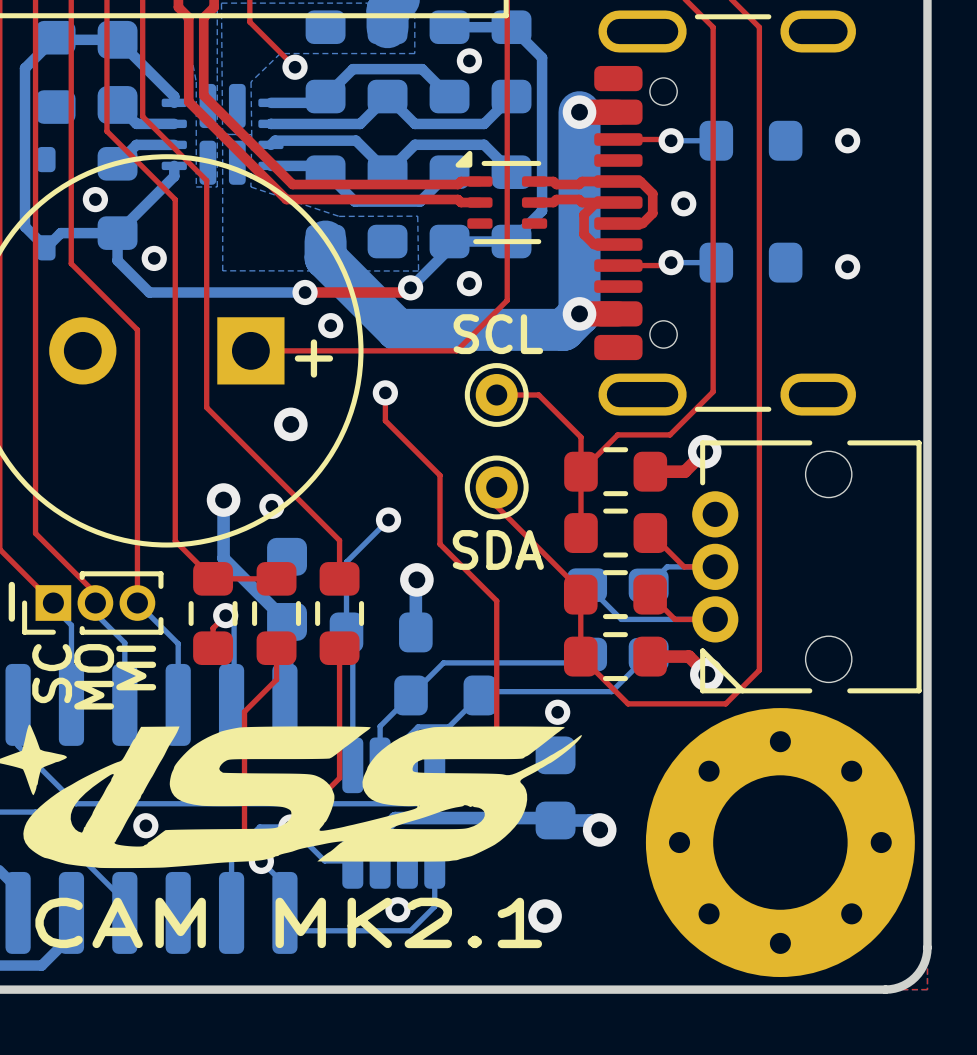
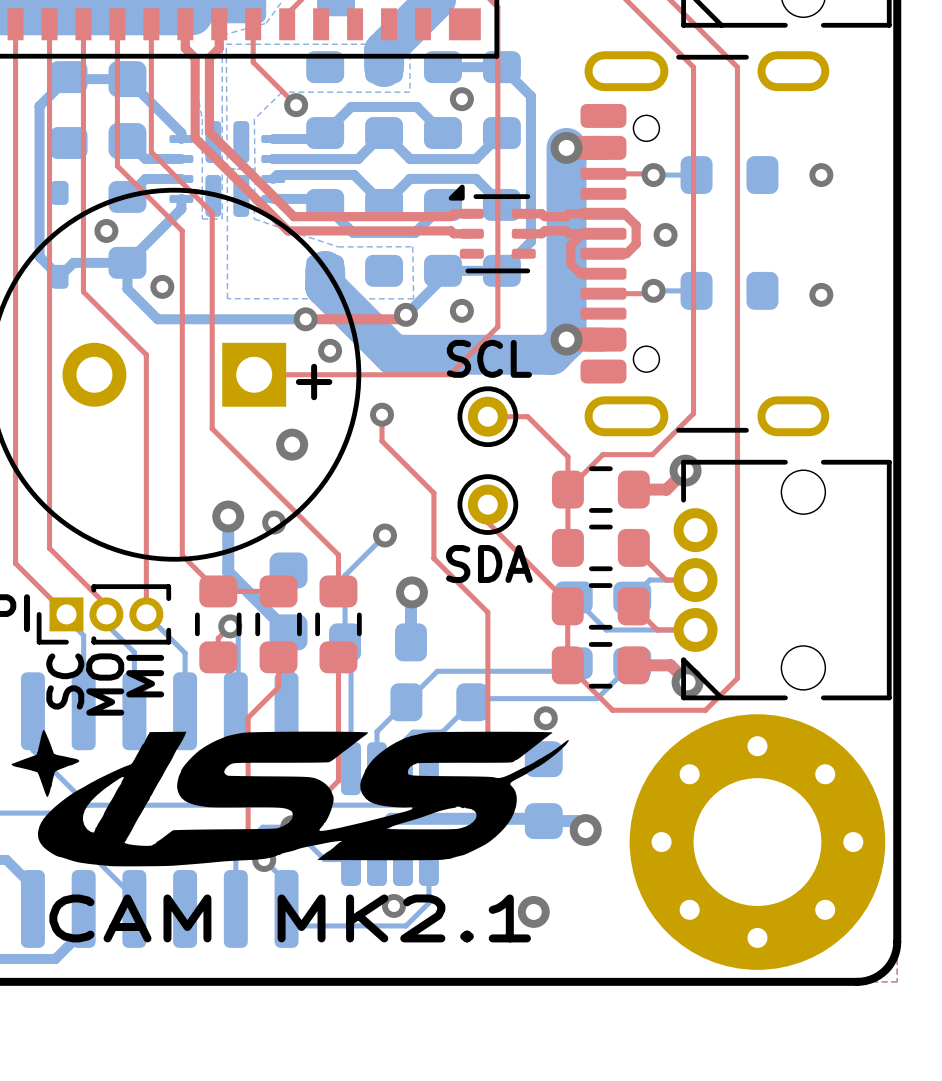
via: (145, 825) -> none

